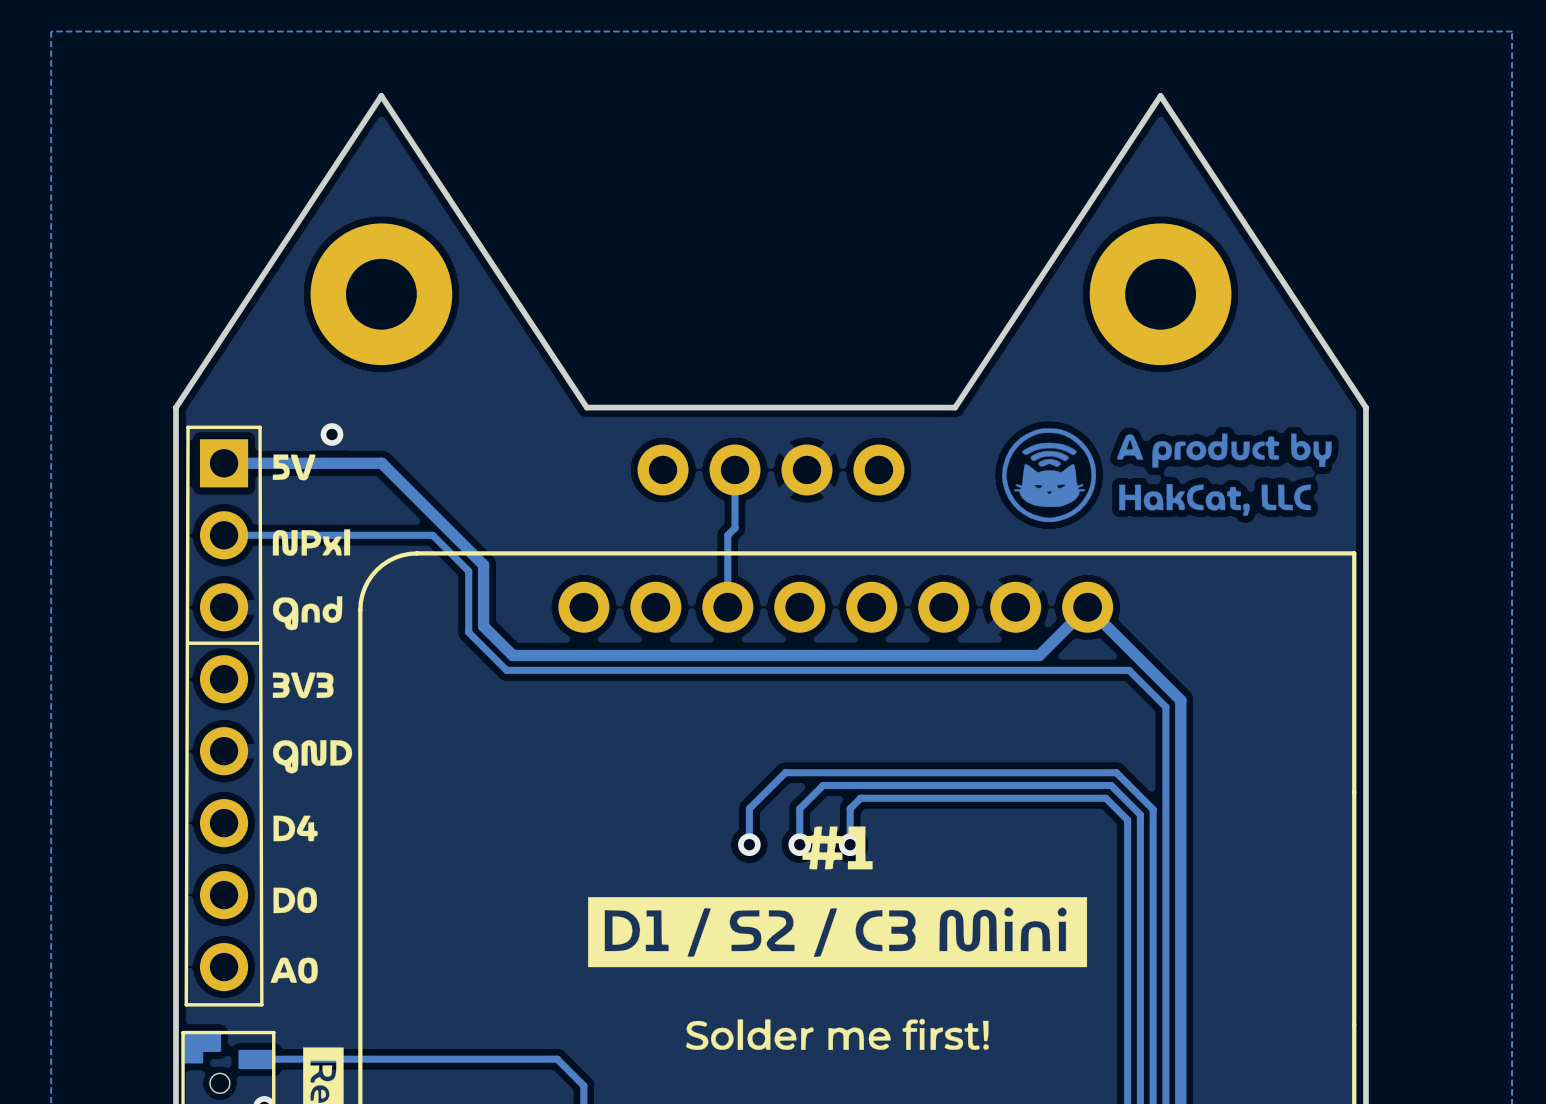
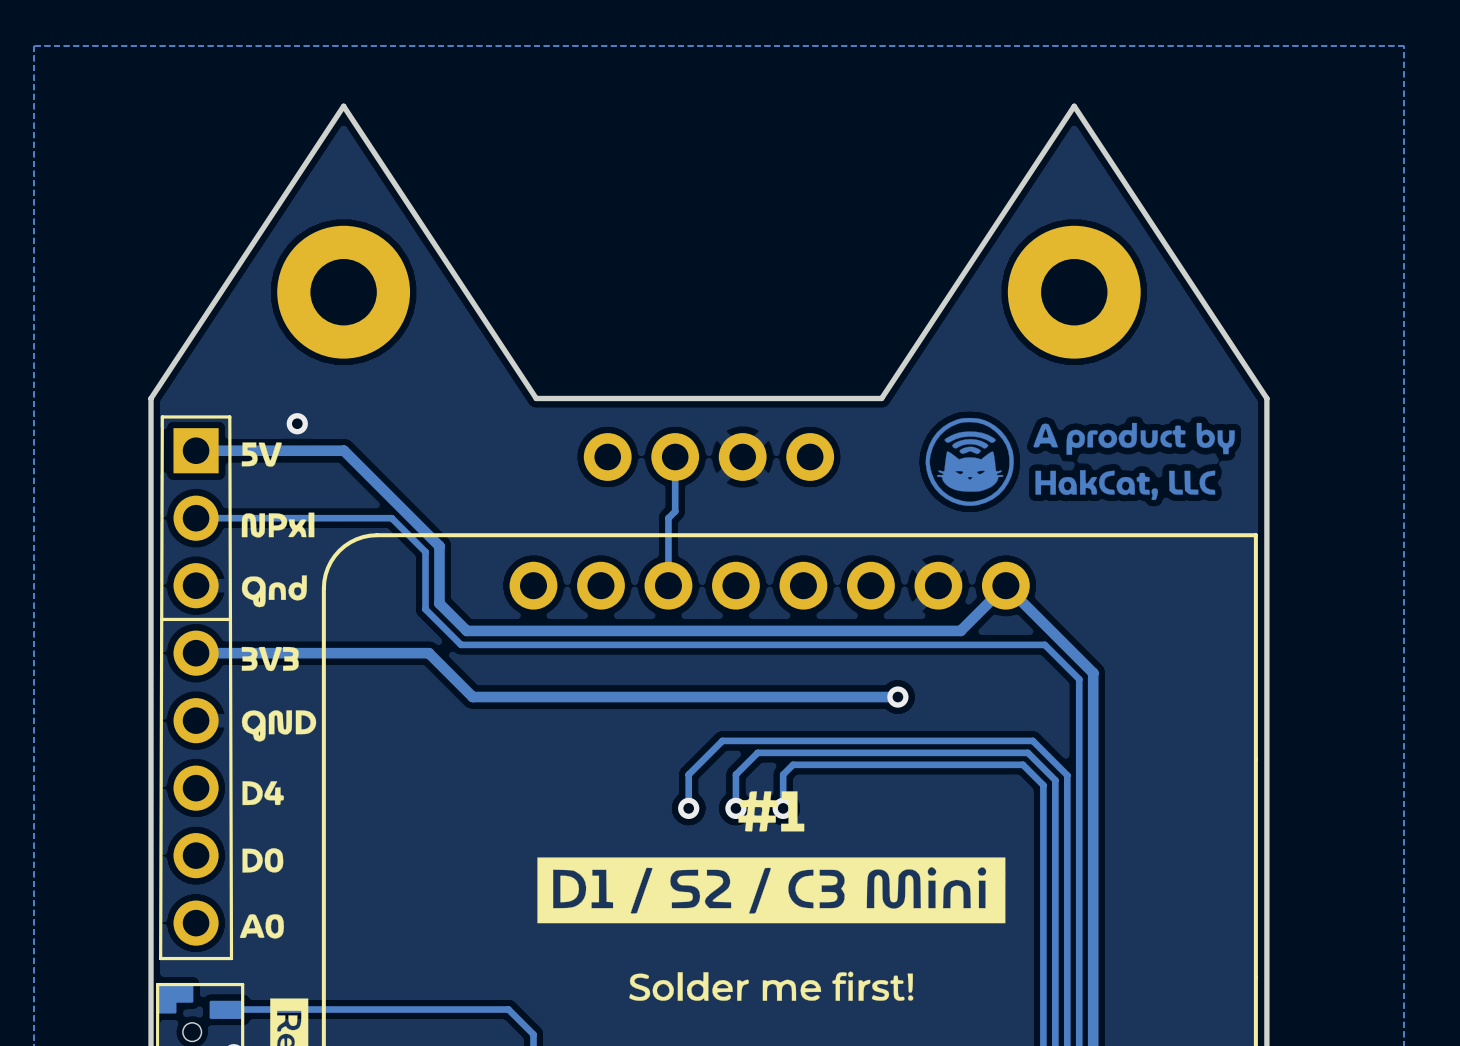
track: none -> (196, 653) (428, 653) (472, 697) (897, 697)
via: none -> (897, 697)

